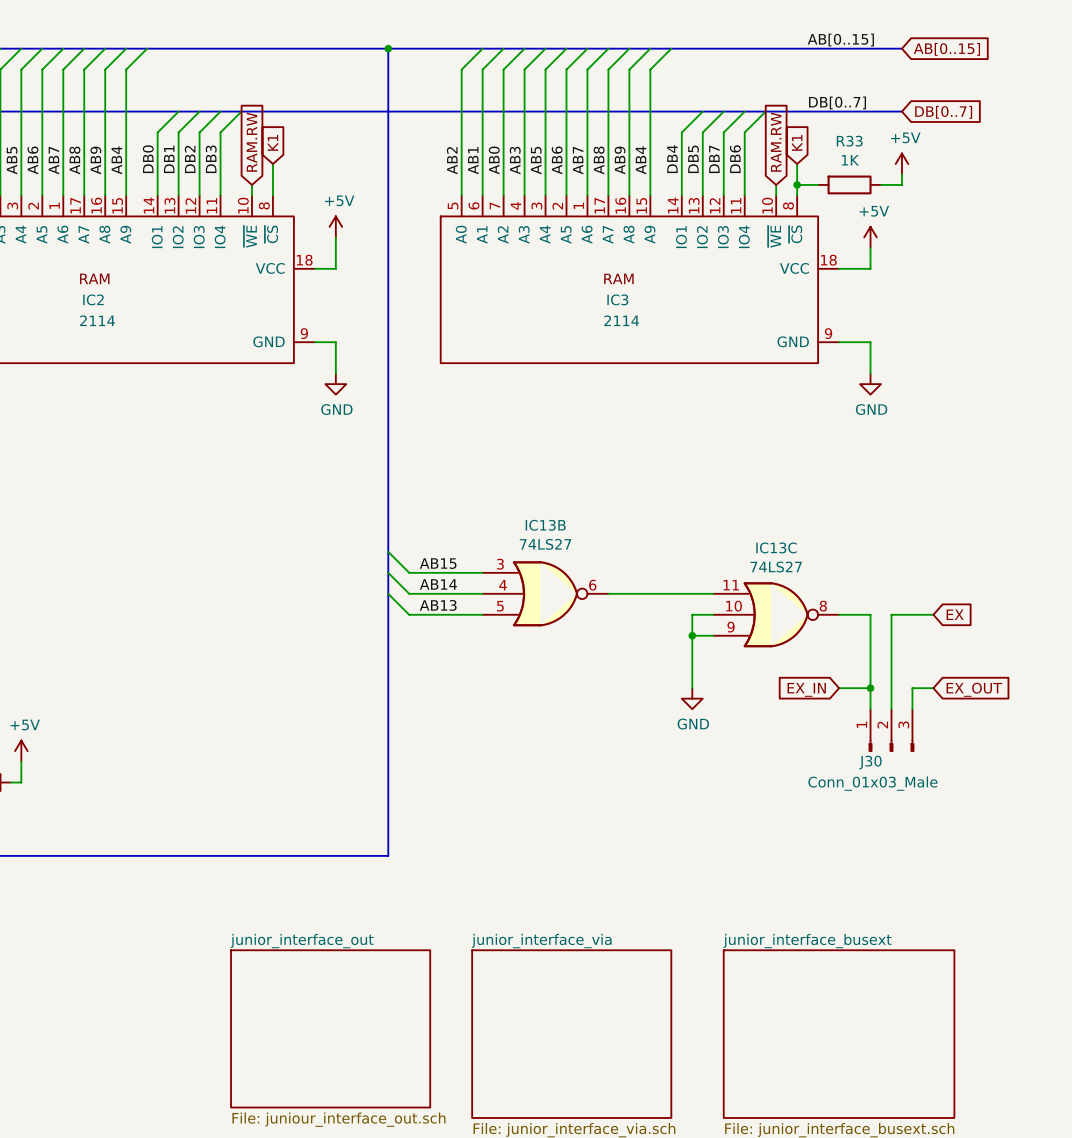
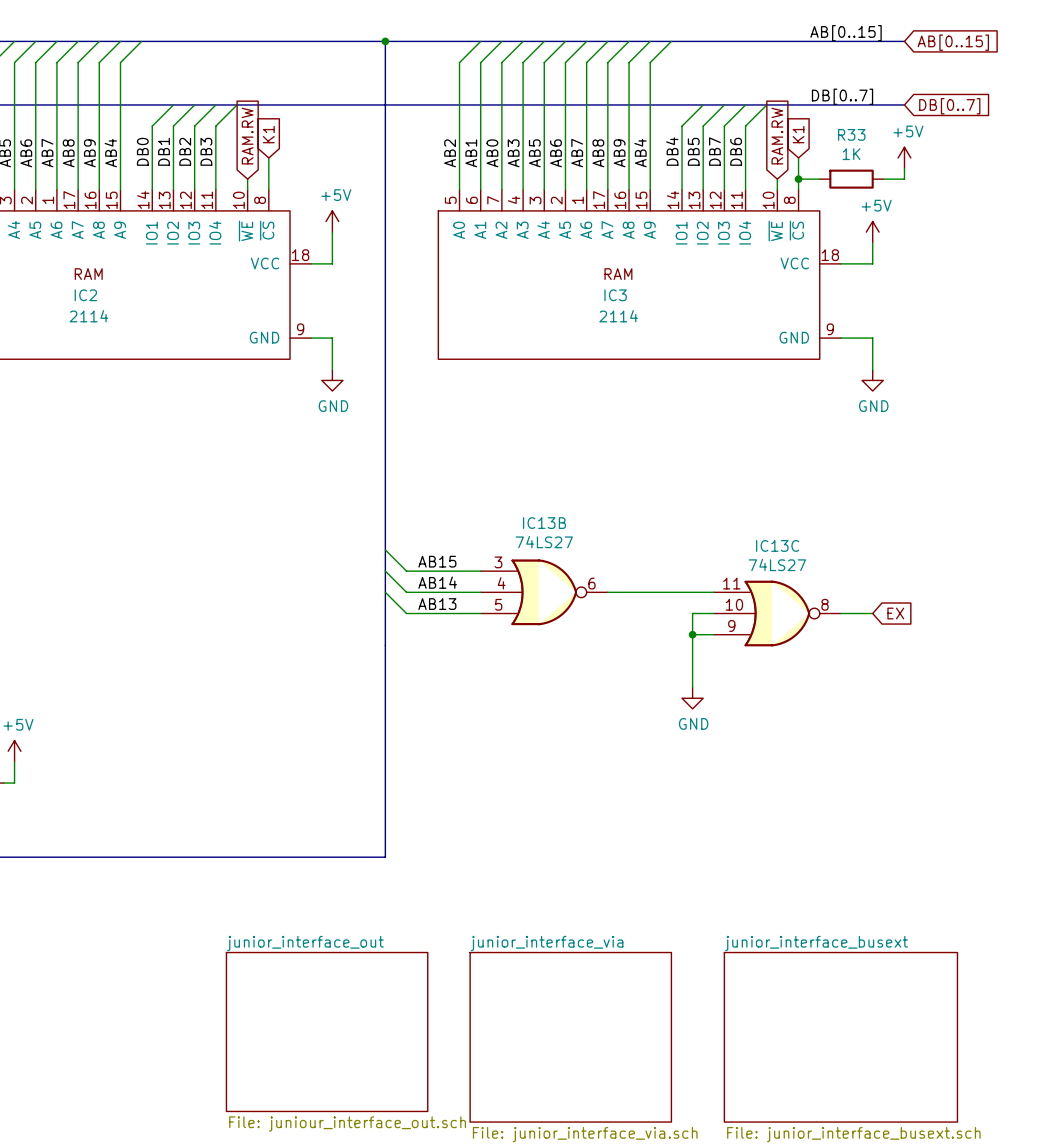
wire: (870, 614) (870, 709) -> none
wire: (933, 614) (891, 614) (891, 709) -> none
global label position: EX (955, 614) -> EX (895, 613)
wire: (839, 688) (870, 688) -> none
junction: (870, 688) -> none
wire: (933, 688) (912, 688) (912, 709) -> none
global label: EX_IN (806, 689) -> none
global label: EX_OUT (974, 689) -> none
J30: Conn_01x03_Male (891, 730) -> none

